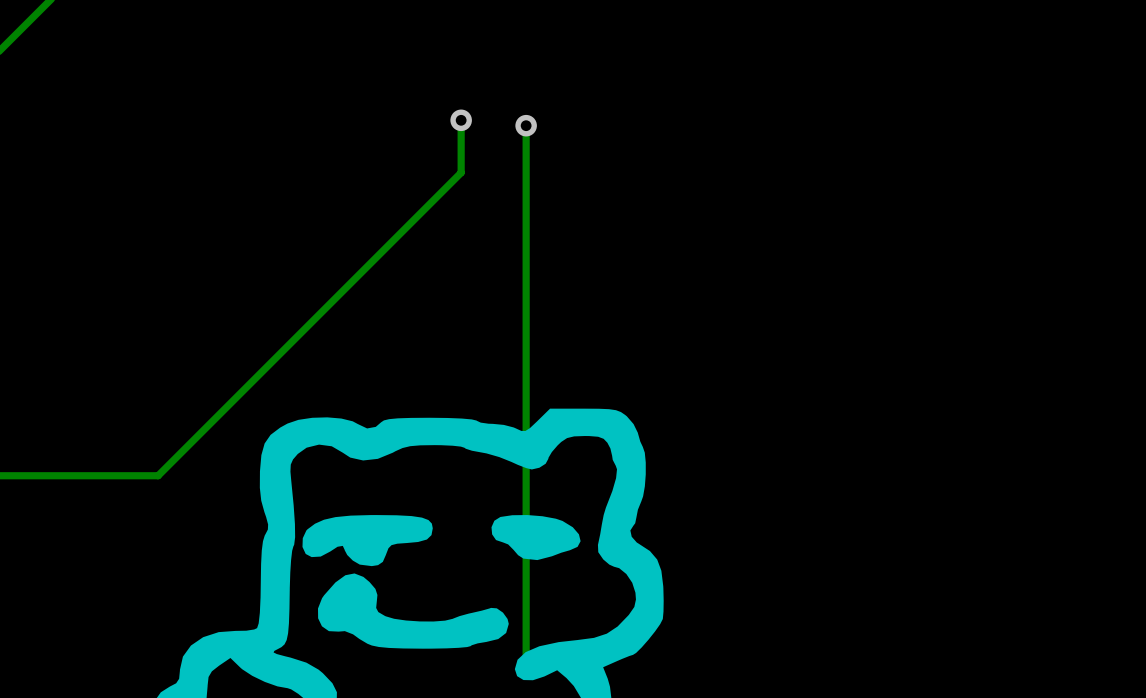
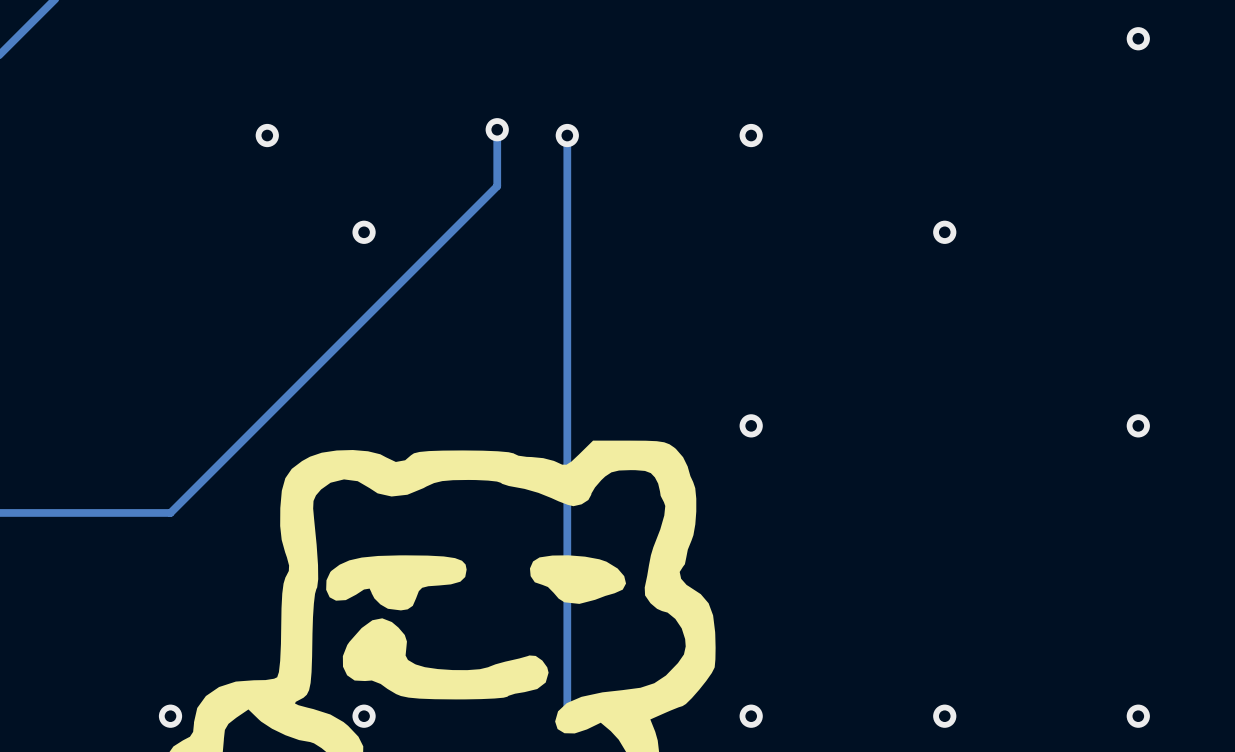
via: none -> (1138, 38)
via: none -> (267, 135)
via: none -> (751, 135)
via: none -> (364, 232)
via: none -> (944, 232)
via: none -> (751, 425)
via: none -> (1138, 425)
via: none -> (170, 716)
via: none -> (364, 716)
via: none -> (751, 716)
via: none -> (944, 716)
via: none -> (1138, 716)

